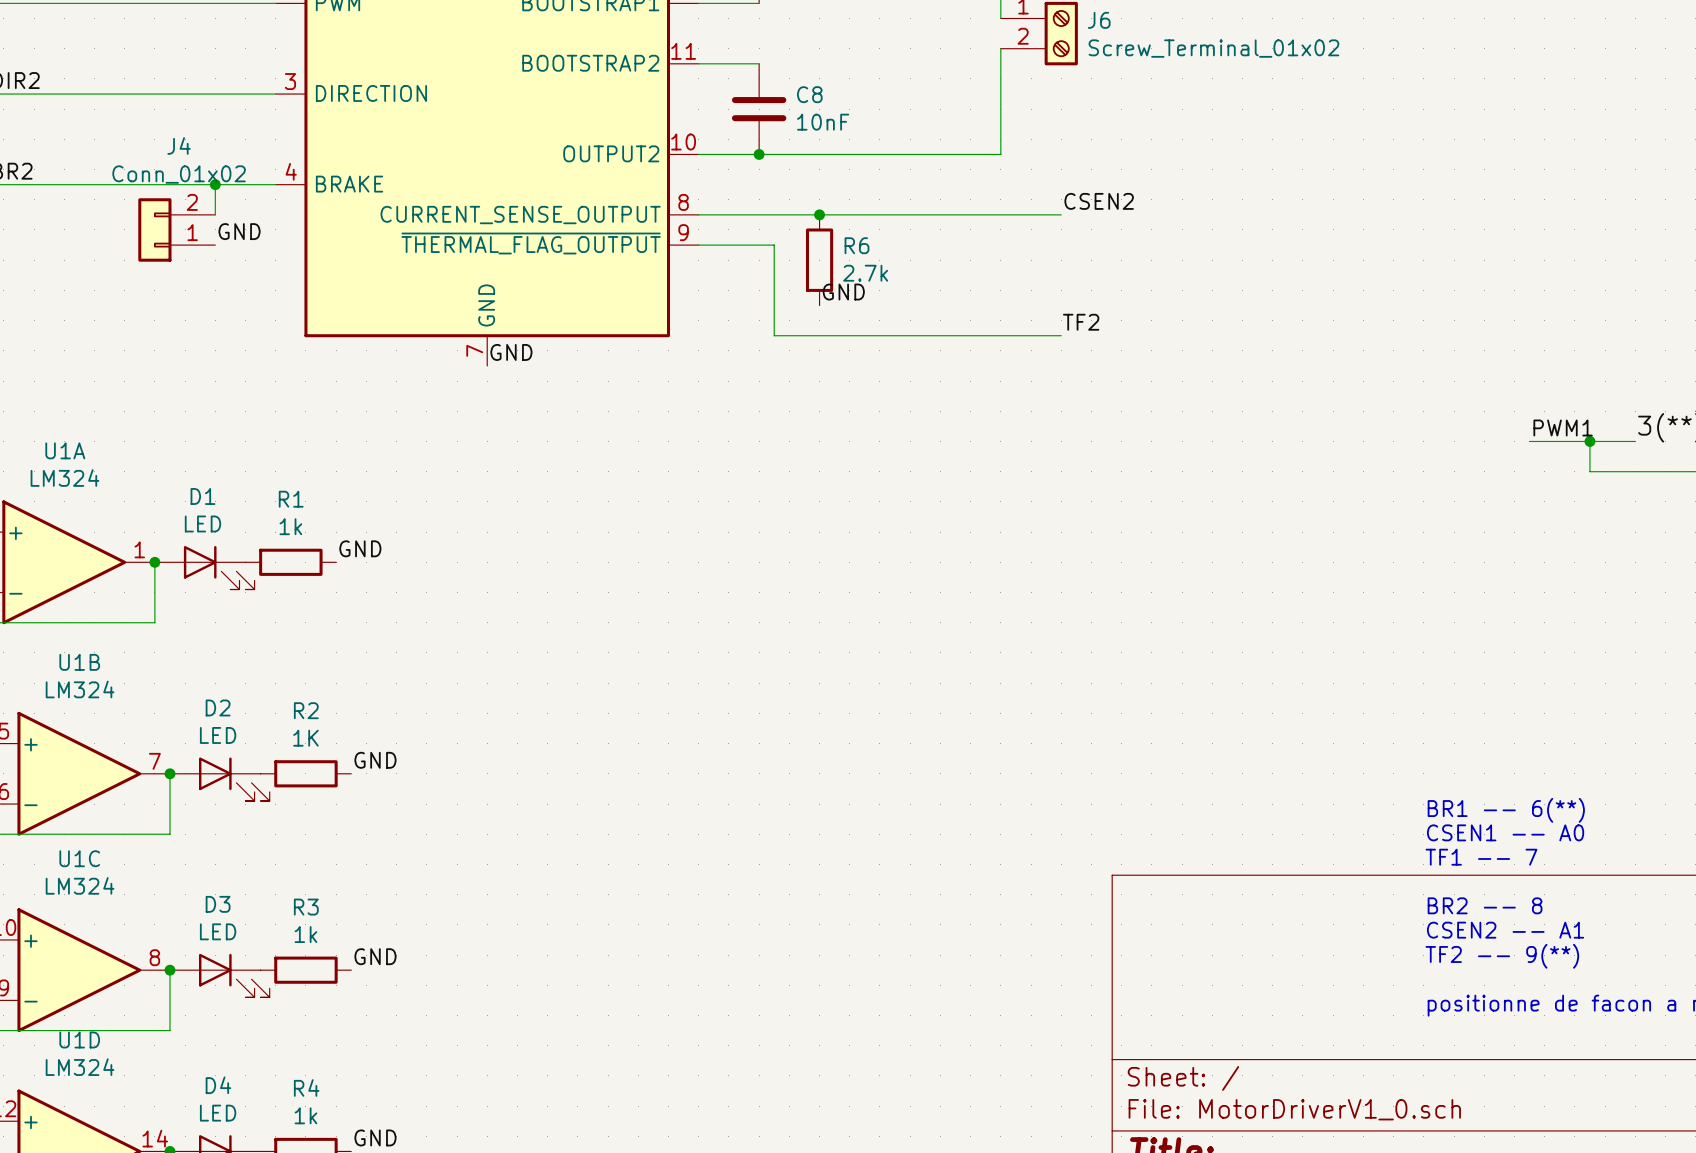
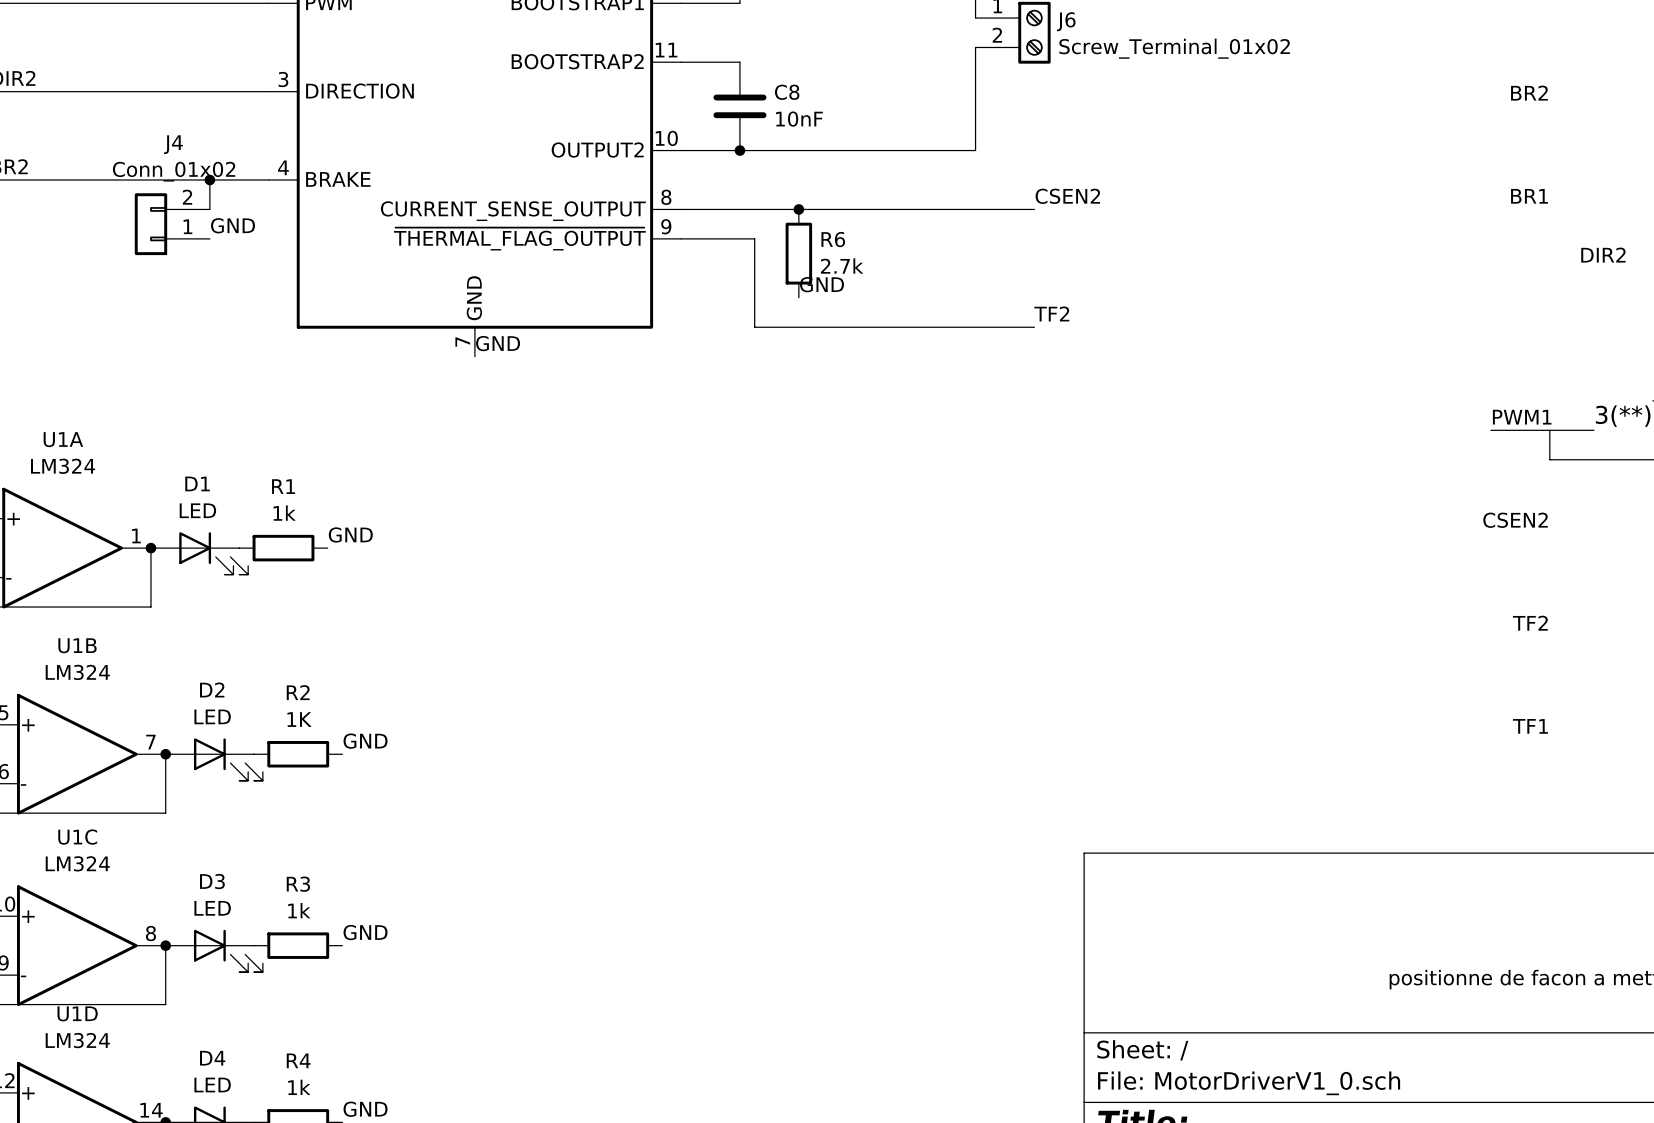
label: none -> BR2 (1529, 93)
label: none -> BR1 (1529, 196)
label: none -> DIR2 (1603, 255)
junction: (1589, 441) -> none
label: none -> CSEN2 (1515, 520)
label: none -> TF2 (1530, 623)
label: none -> TF1 (1530, 726)
text: BR1 -- 6(**) (1506, 810) -> none
text: CSEN1 -- A0 (1505, 832) -> none
text: TF1 -- 7 (1481, 857) -> none
text: BR2 -- 8 (1485, 905) -> none
text: CSEN2 -- A1 (1505, 930) -> none
text: TF2 -- 9(**) (1502, 956) -> none

